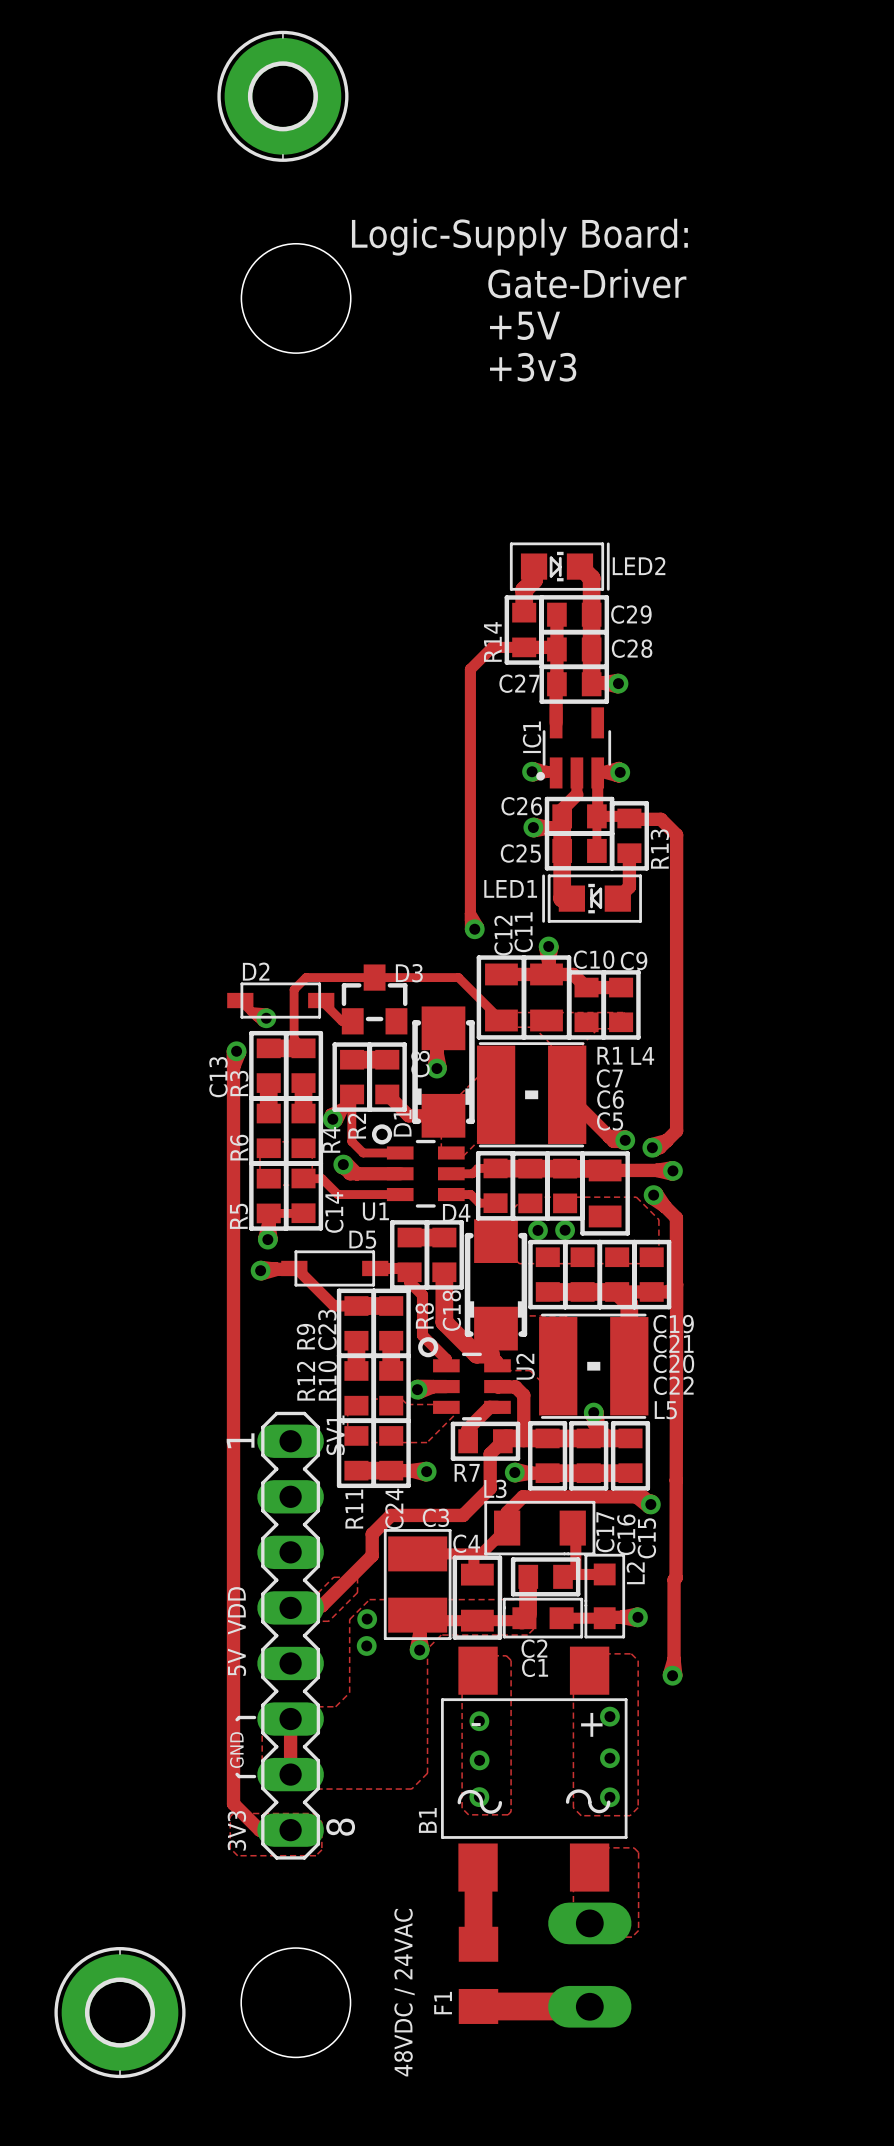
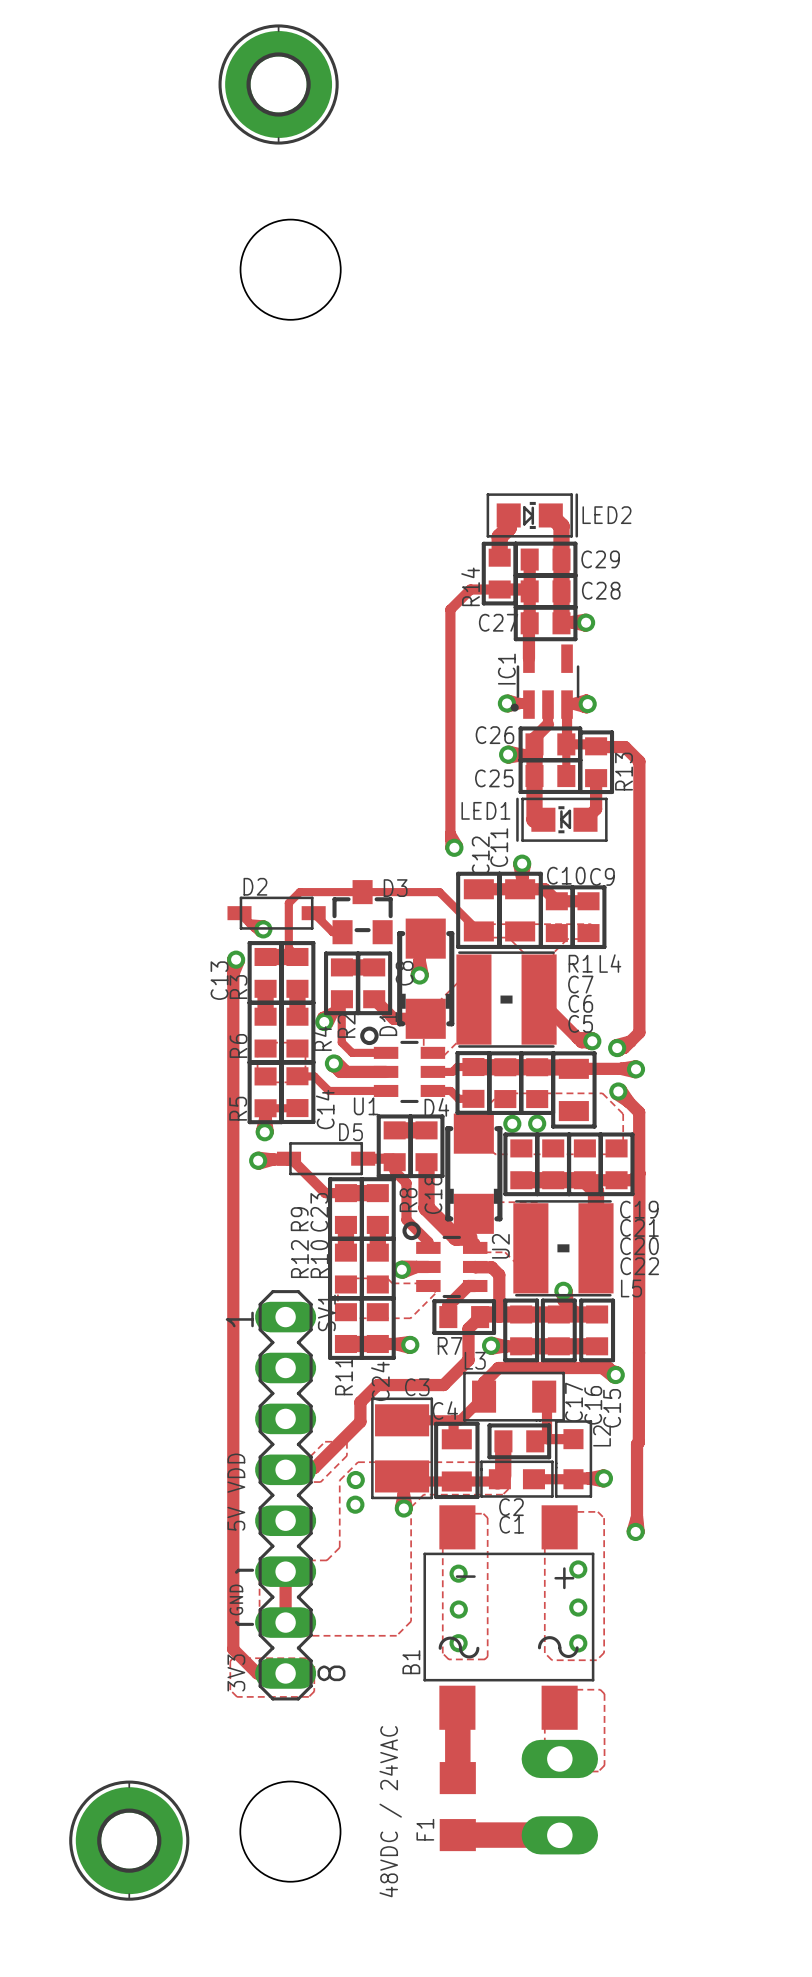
text: Logic-Supply Board: (519, 237) -> none
text: Gate-Driver (587, 283) -> none
text: +5V (525, 325) -> none
text: +3v3 (533, 367) -> none

